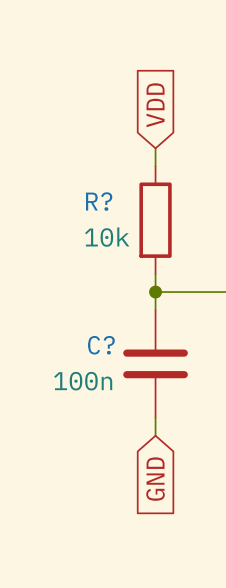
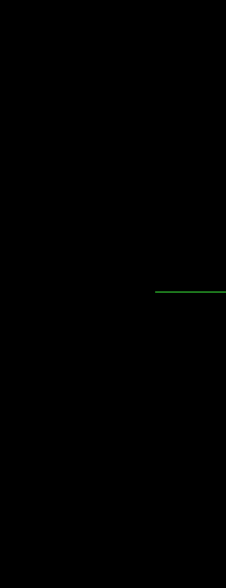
global label: VDD (155, 105) -> none
wire: (155, 148) (155, 166) -> none
R?: 10k (155, 220) -> none
wire: (155, 274) (155, 310) -> none
junction: (155, 292) -> none
C?: 100n (155, 363) -> none
wire: (155, 417) (155, 435) -> none
global label: GND (155, 479) -> none

